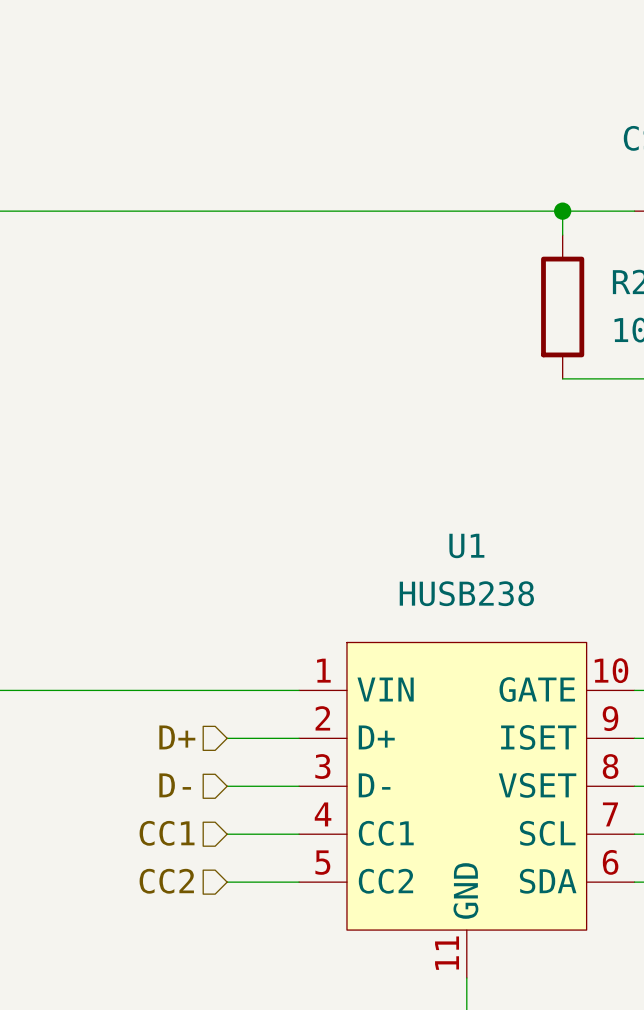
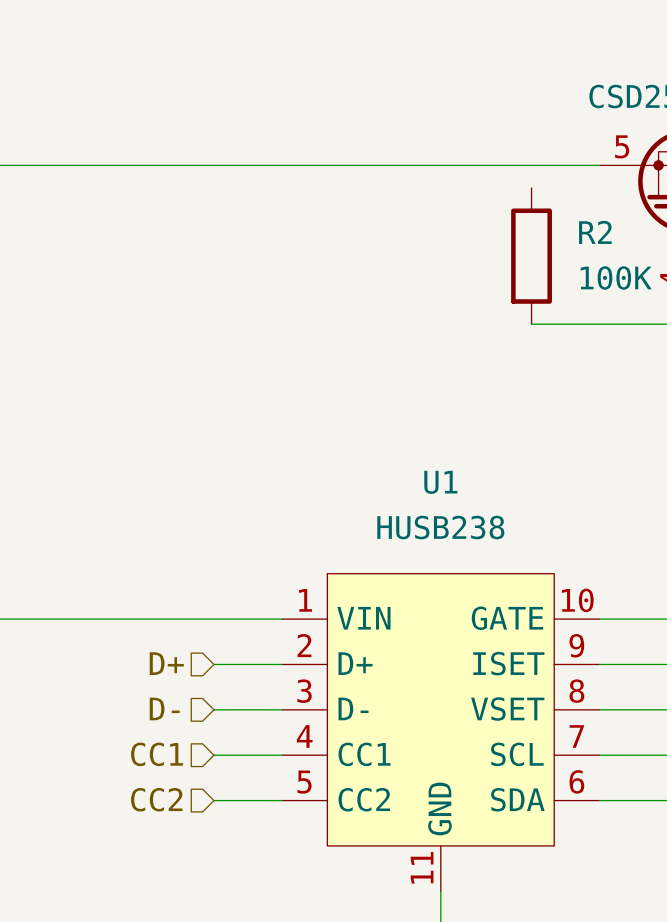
wire: (562, 211) (562, 235) -> none
junction: (562, 211) -> none

